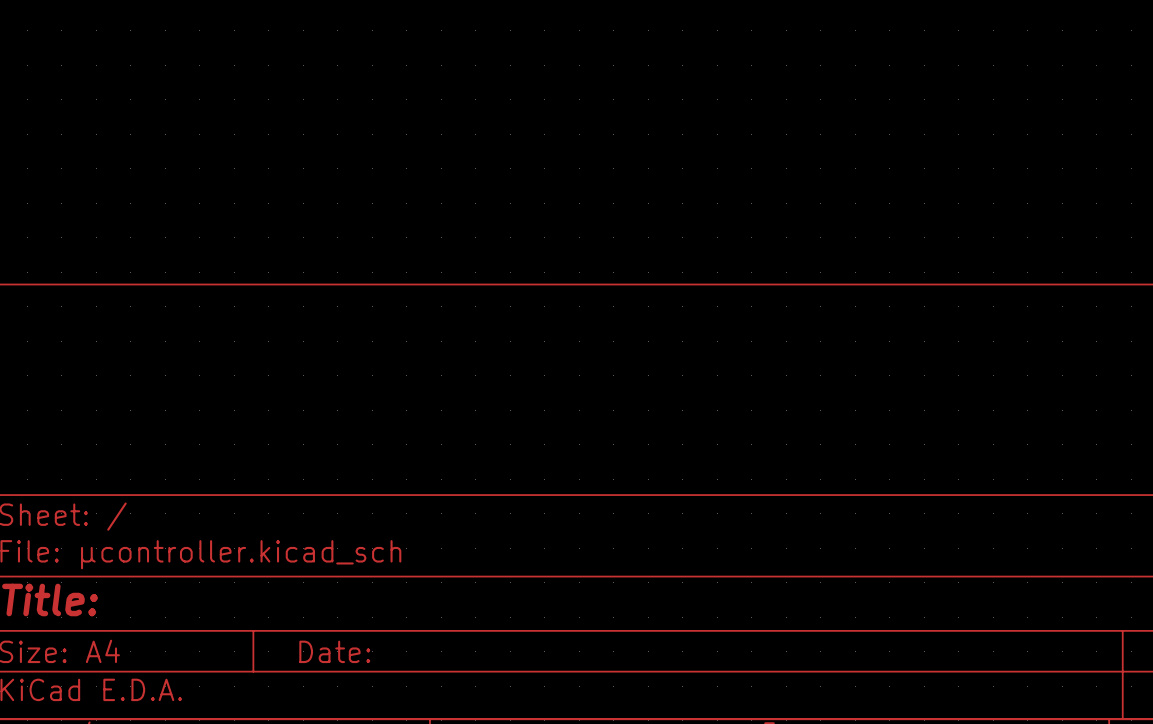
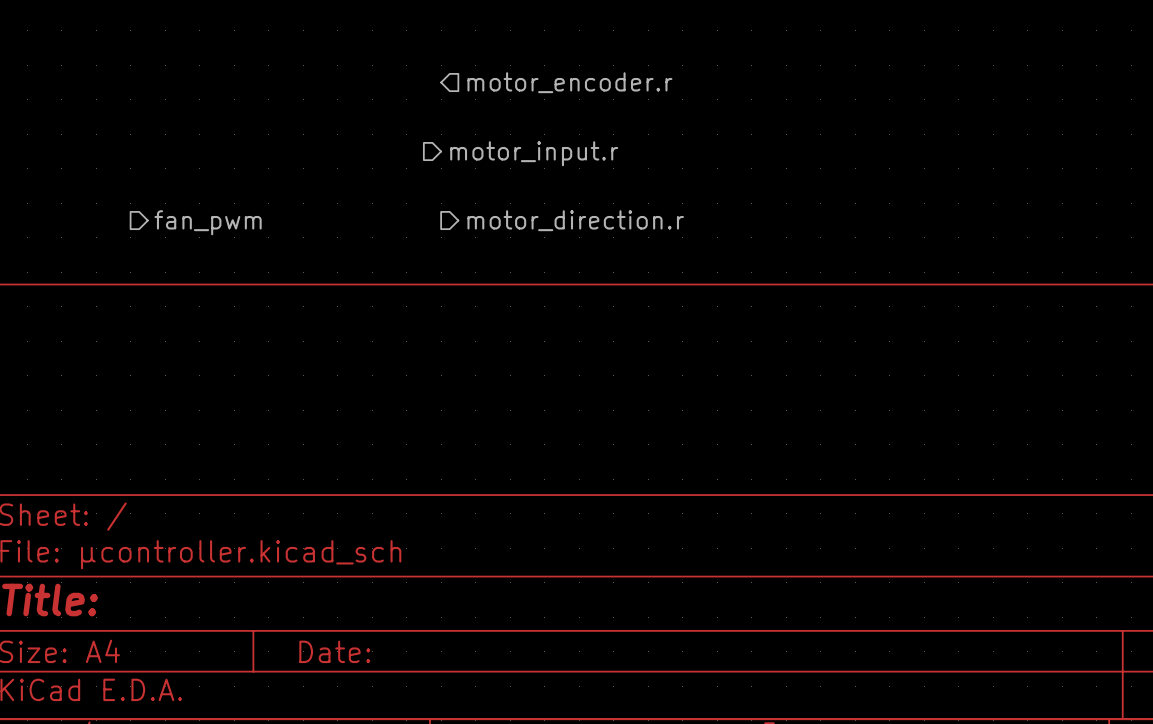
hierarchical label: none -> motor_encoder.r (569, 82)
hierarchical label: none -> motor_input.r (534, 153)
hierarchical label: none -> motor_direction.r (575, 220)
hierarchical label: none -> fan_pwm (208, 222)

